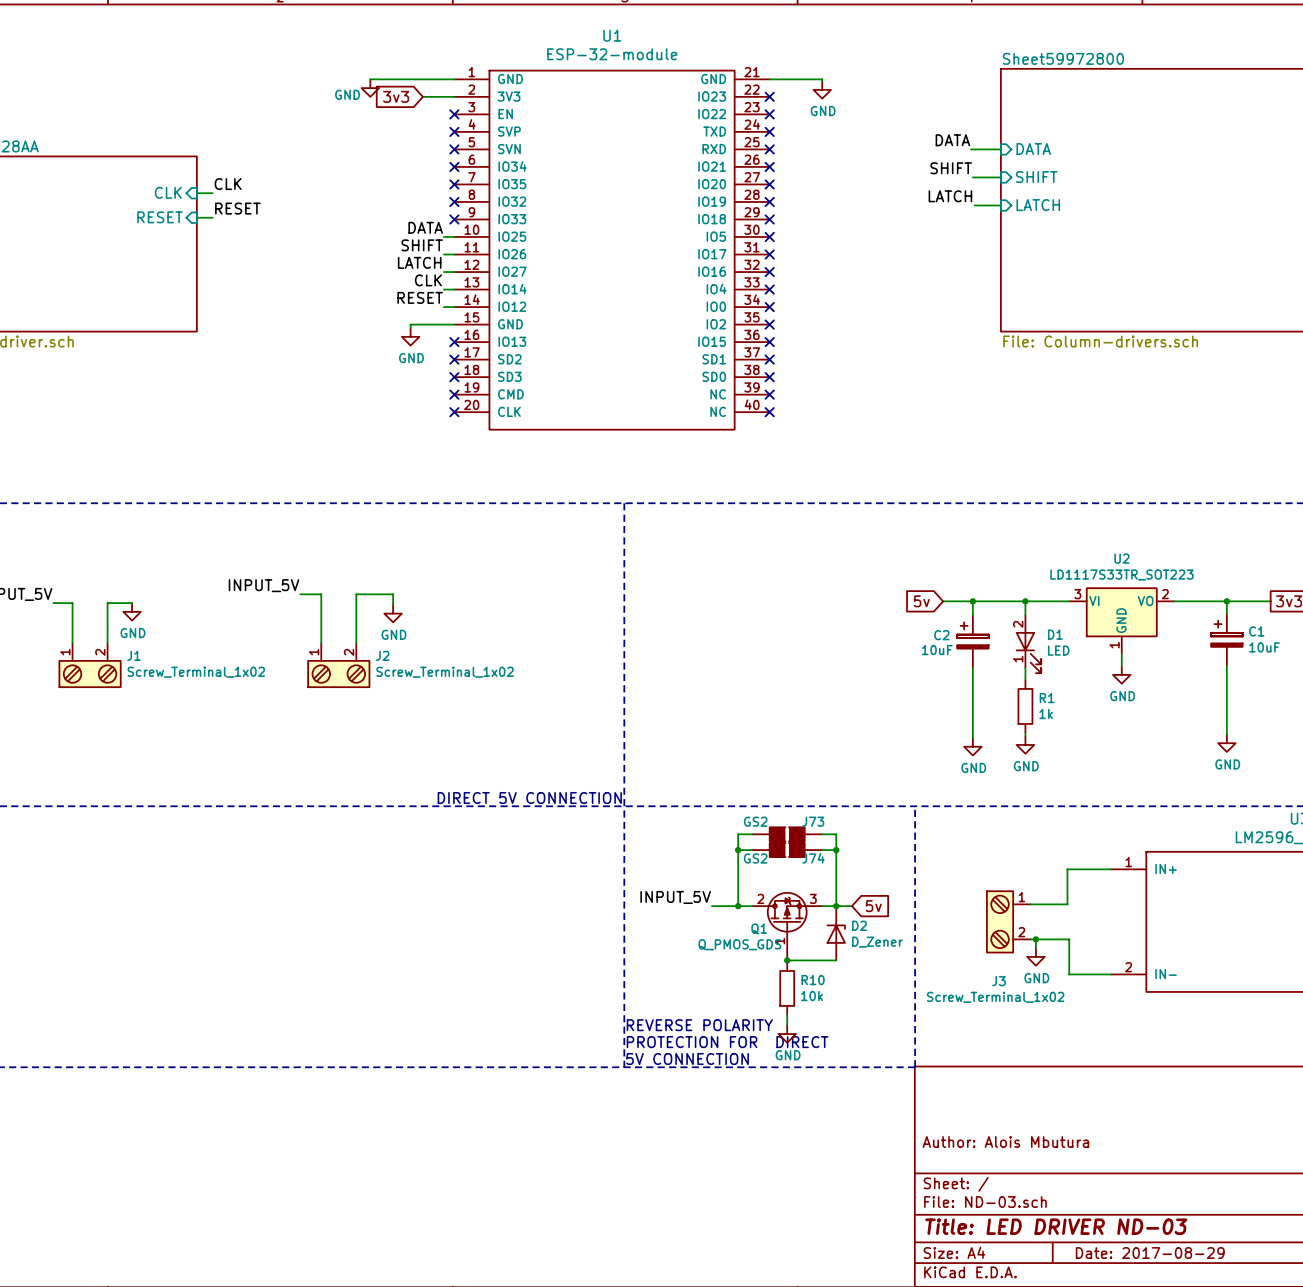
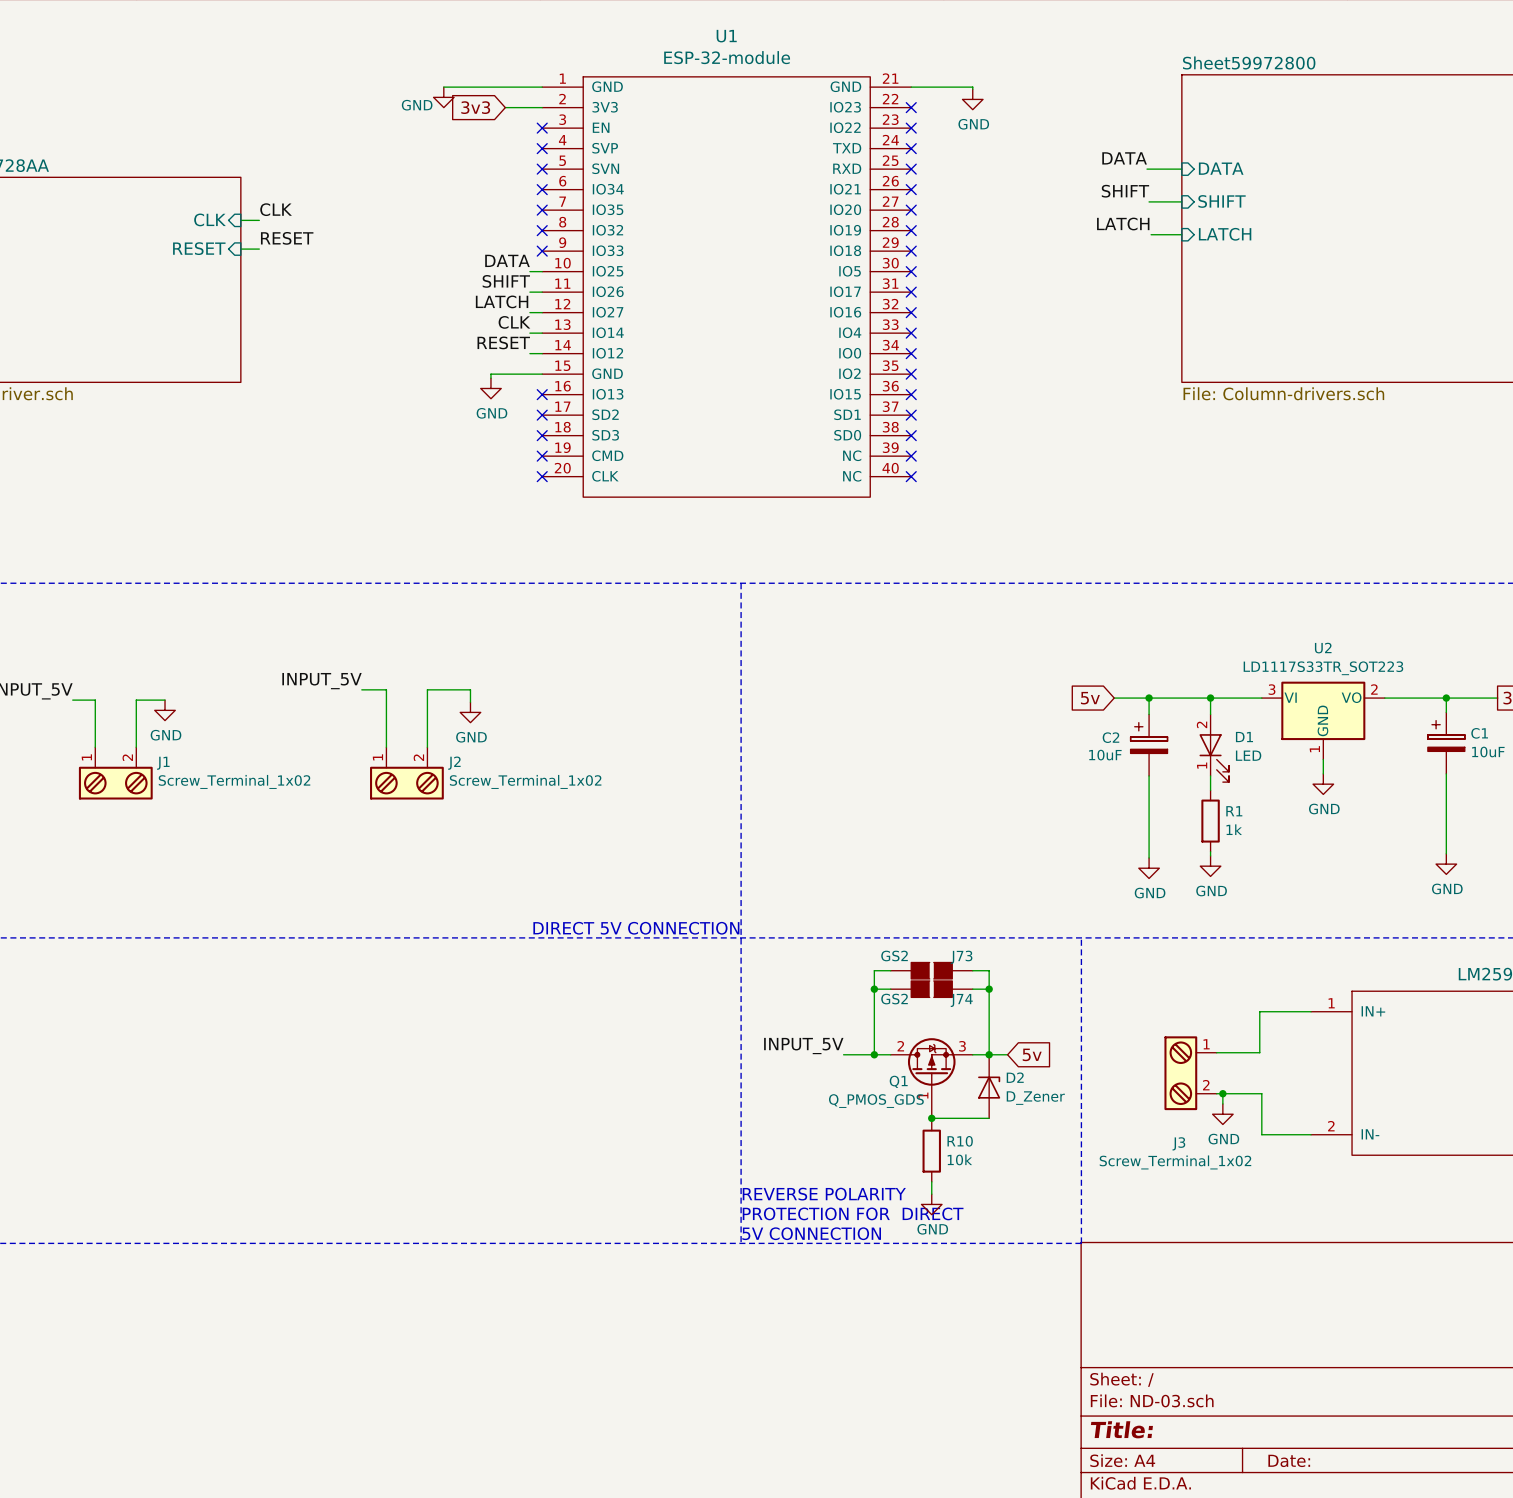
title block: Author: Alois Mbutura (1005, 1142) -> none
title block: Title: LED DRIVER ND-03 (1056, 1226) -> Title: (1121, 1429)
title block: Date: 2017-08-29 (1150, 1253) -> Date: (1289, 1460)

